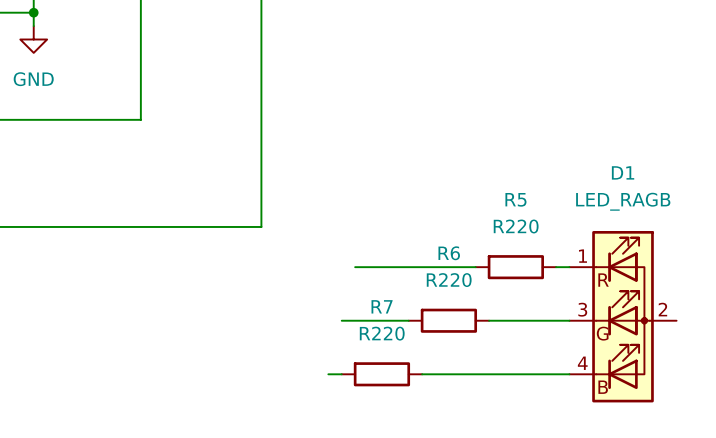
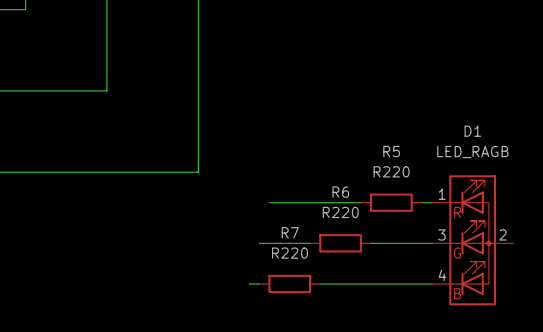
wire: (33, 12) (33, 26) -> none
junction: (33, 12) -> none
power symbol: GND (33, 39) -> none

